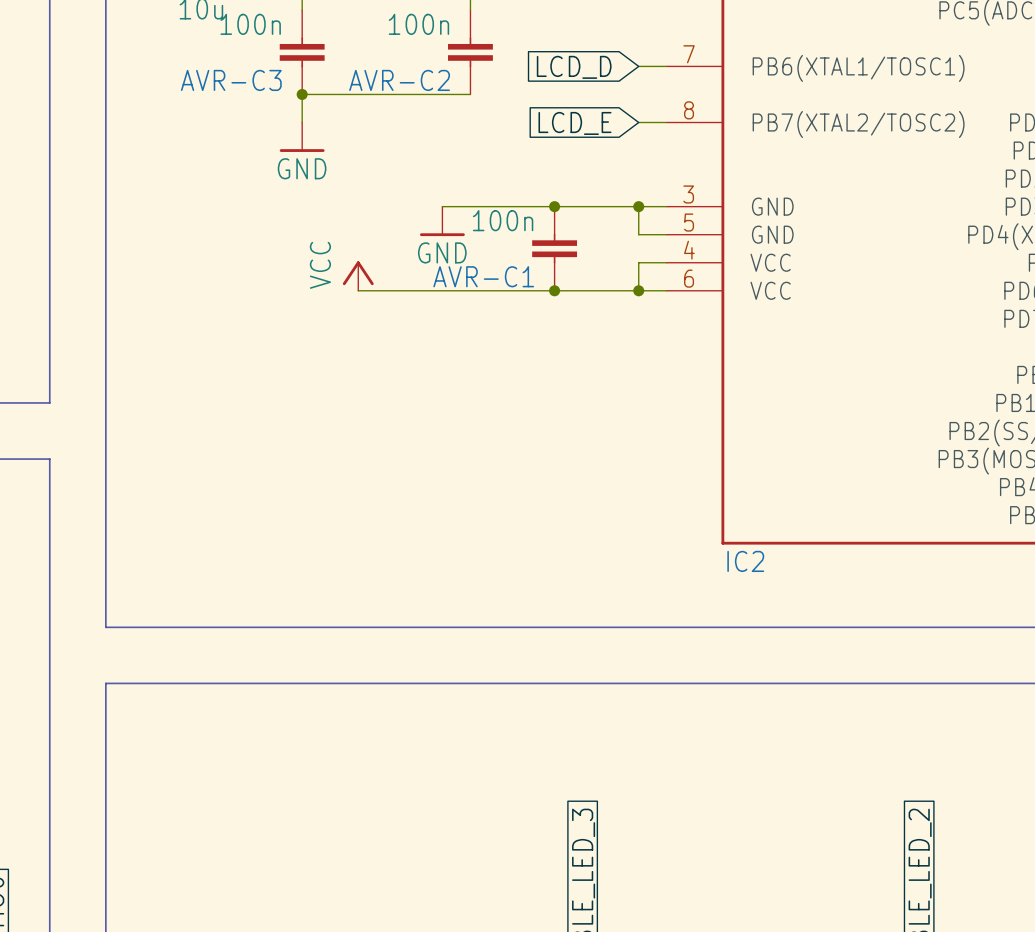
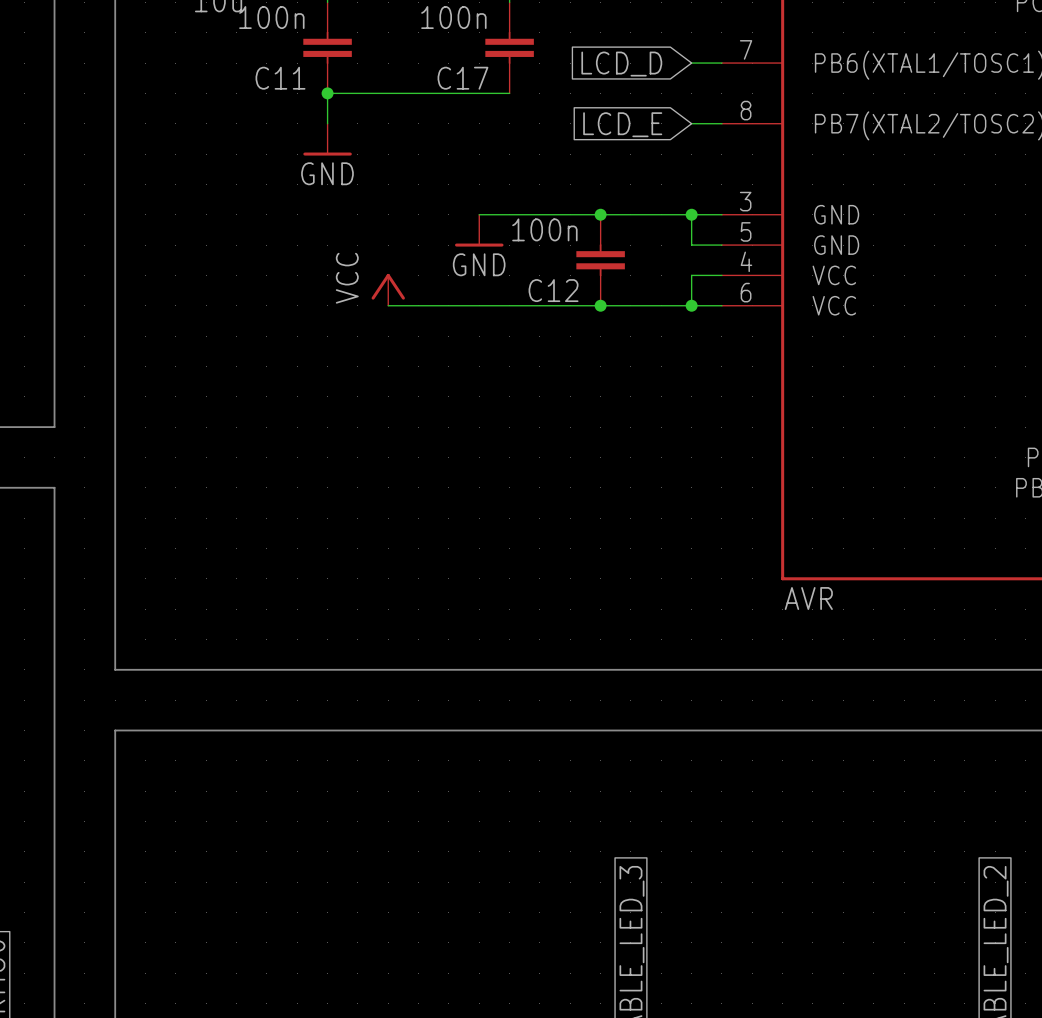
AVR-C3 name: AVR-C3 (231, 80) -> C11 (280, 78)
AVR-C2 name: AVR-C2 (399, 80) -> C17 (462, 78)
AVR-C1 name: AVR-C1 (483, 276) -> C12 (553, 290)
IC2 name: IC2 (745, 561) -> AVR (808, 598)

